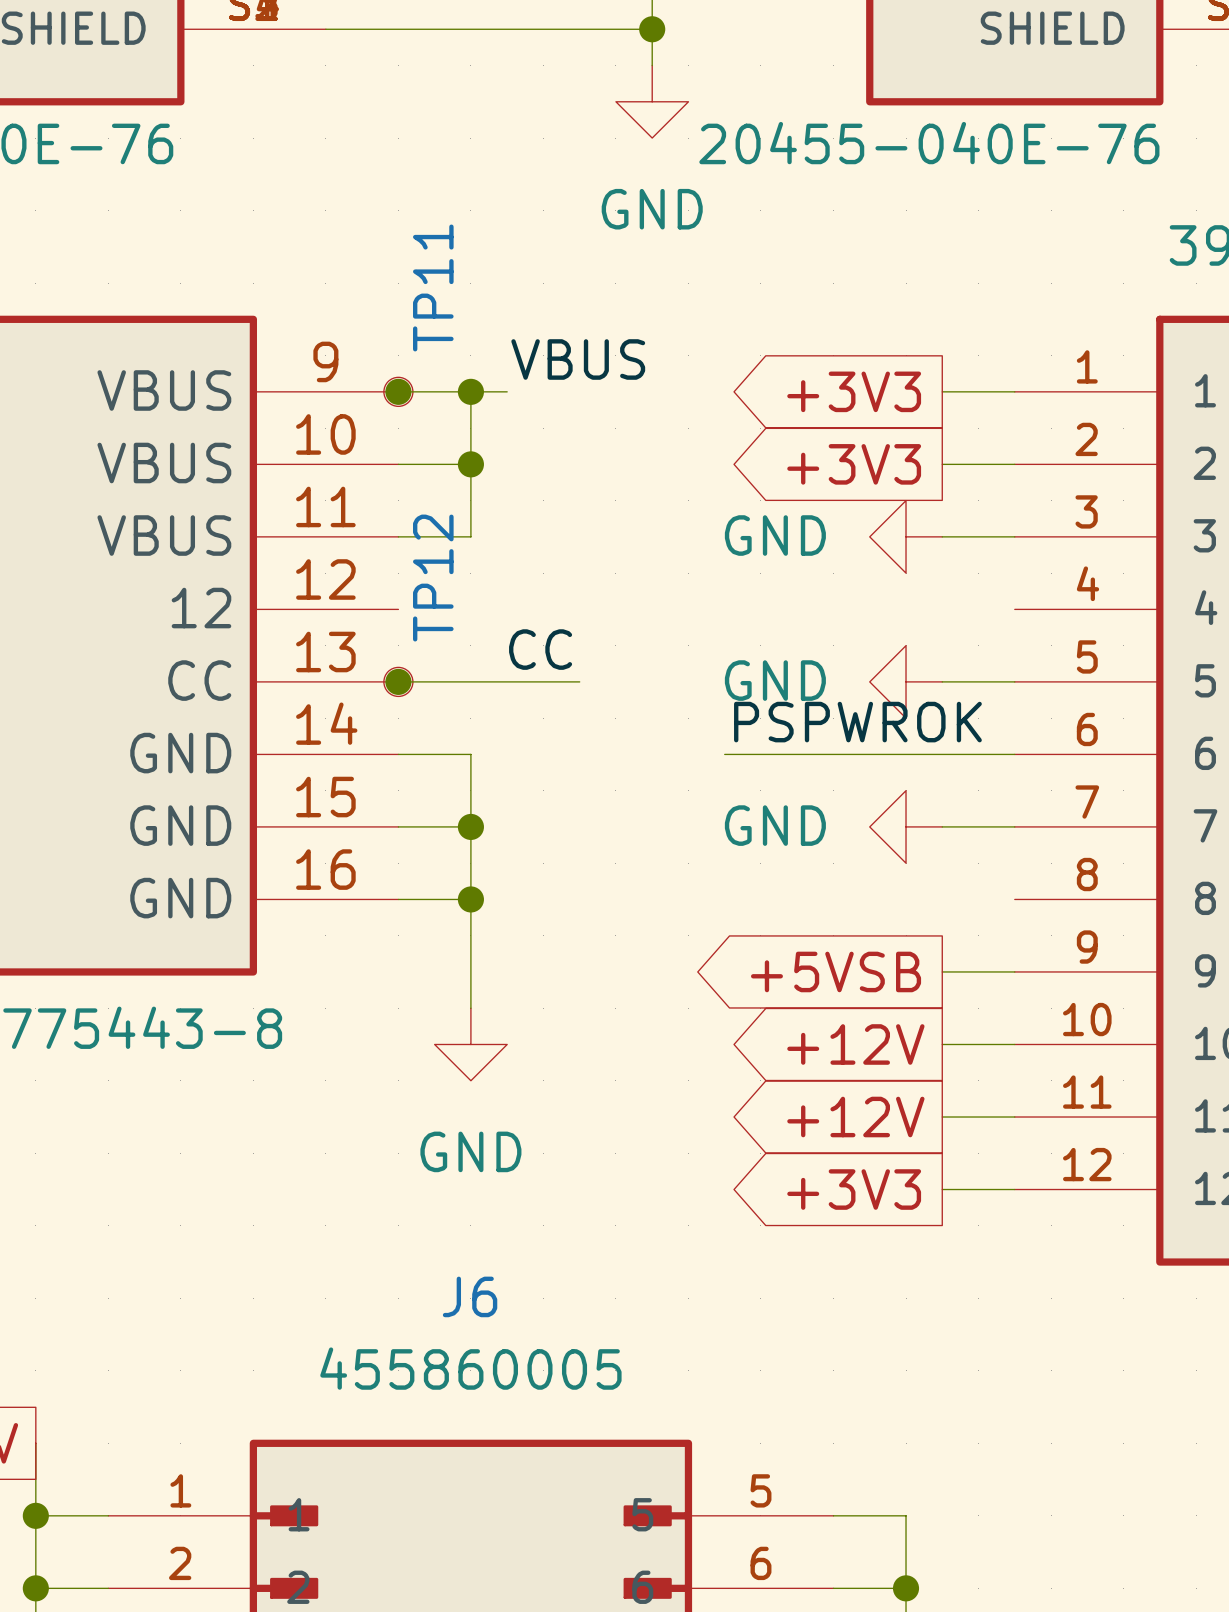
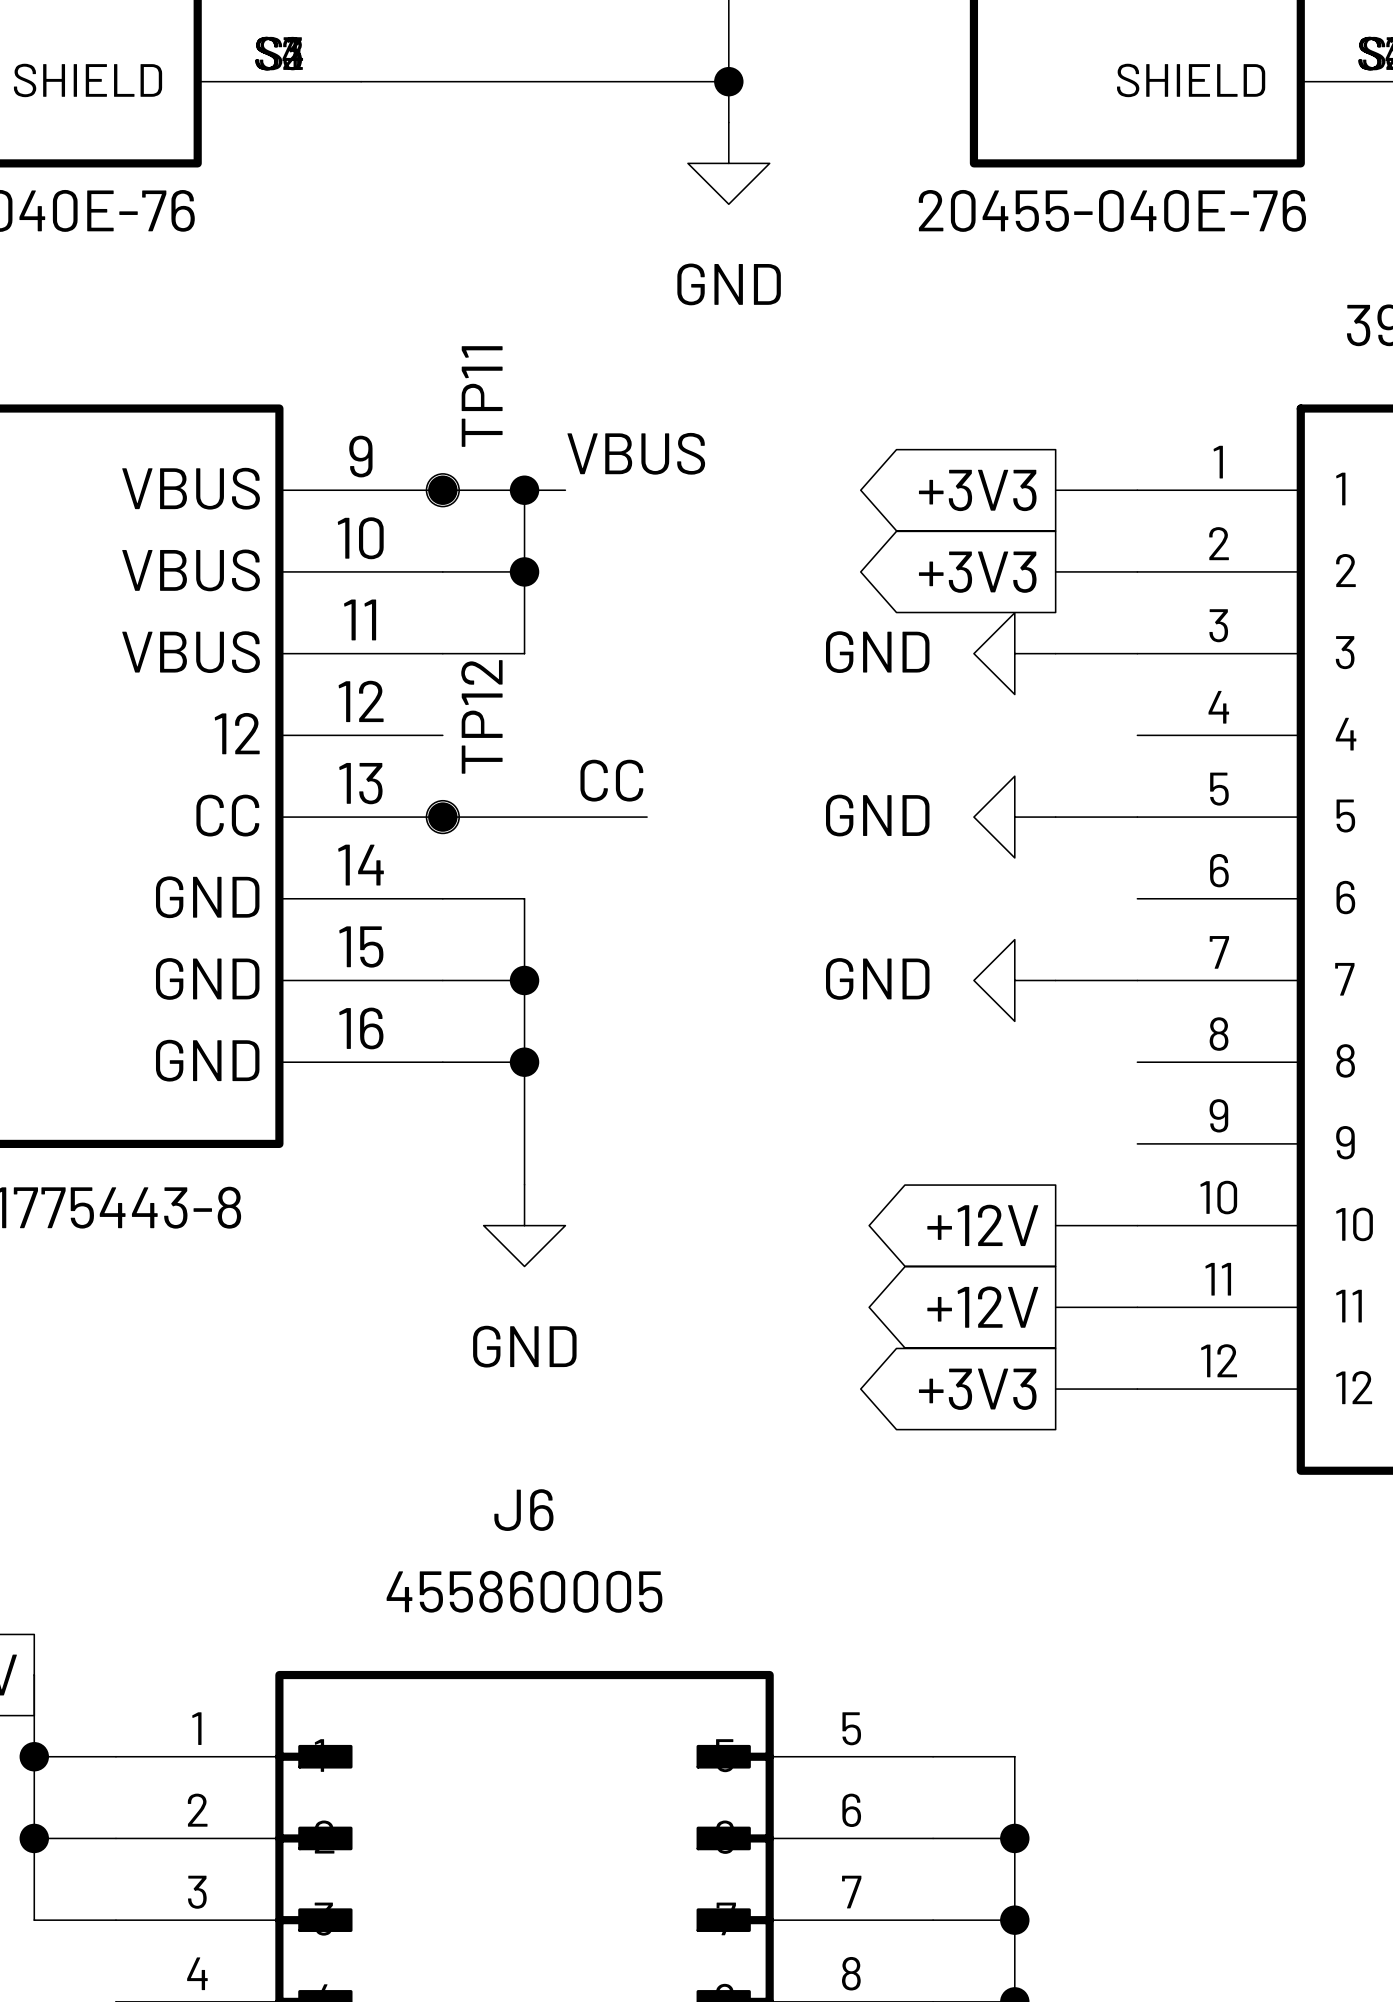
label: PSPWROK (857, 722) -> none
wire: (724, 754) (1014, 754) -> none
global label: +5VSB (836, 971) -> none
wire: (942, 971) (1014, 971) -> none

